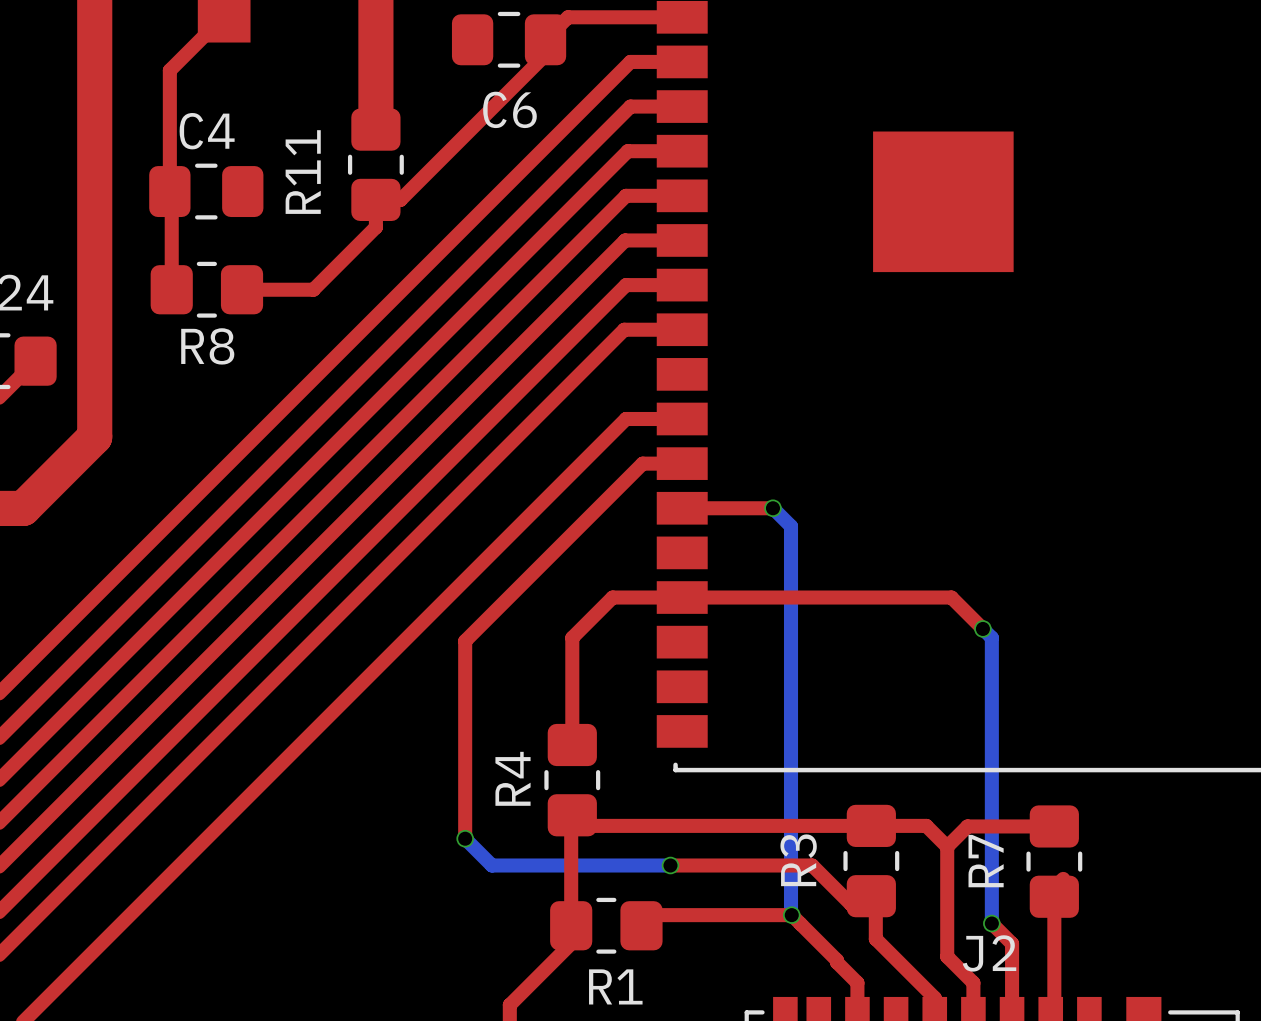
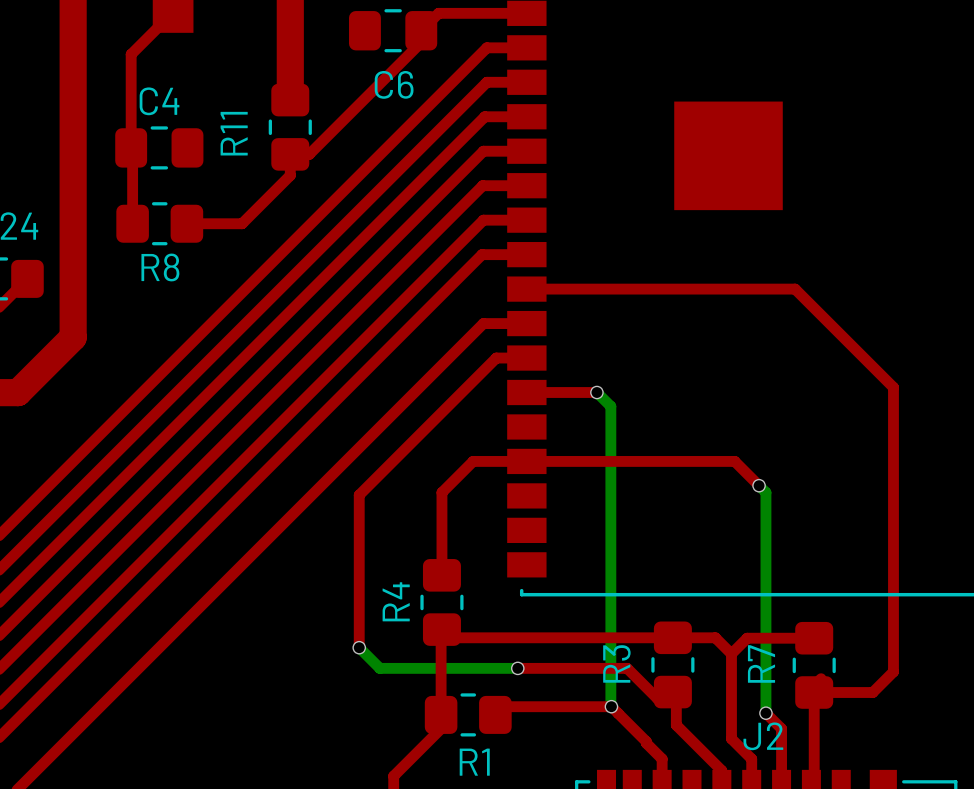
top track: none -> (526, 289) (795, 289) (893, 387) (893, 671) (872, 692) (814, 692)

